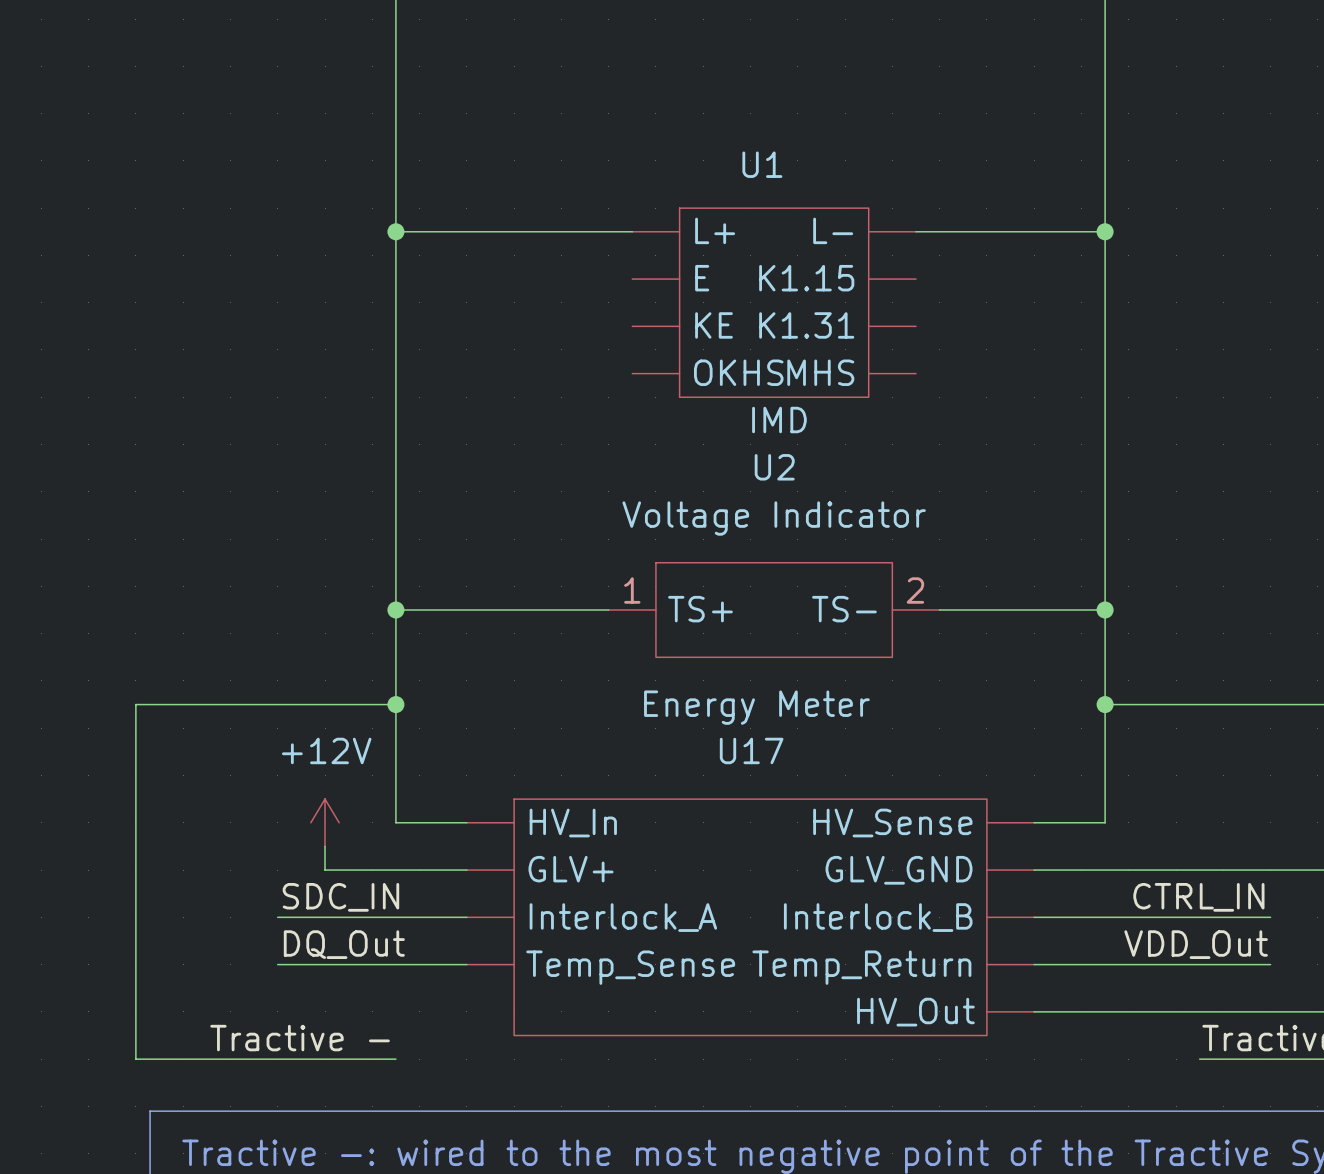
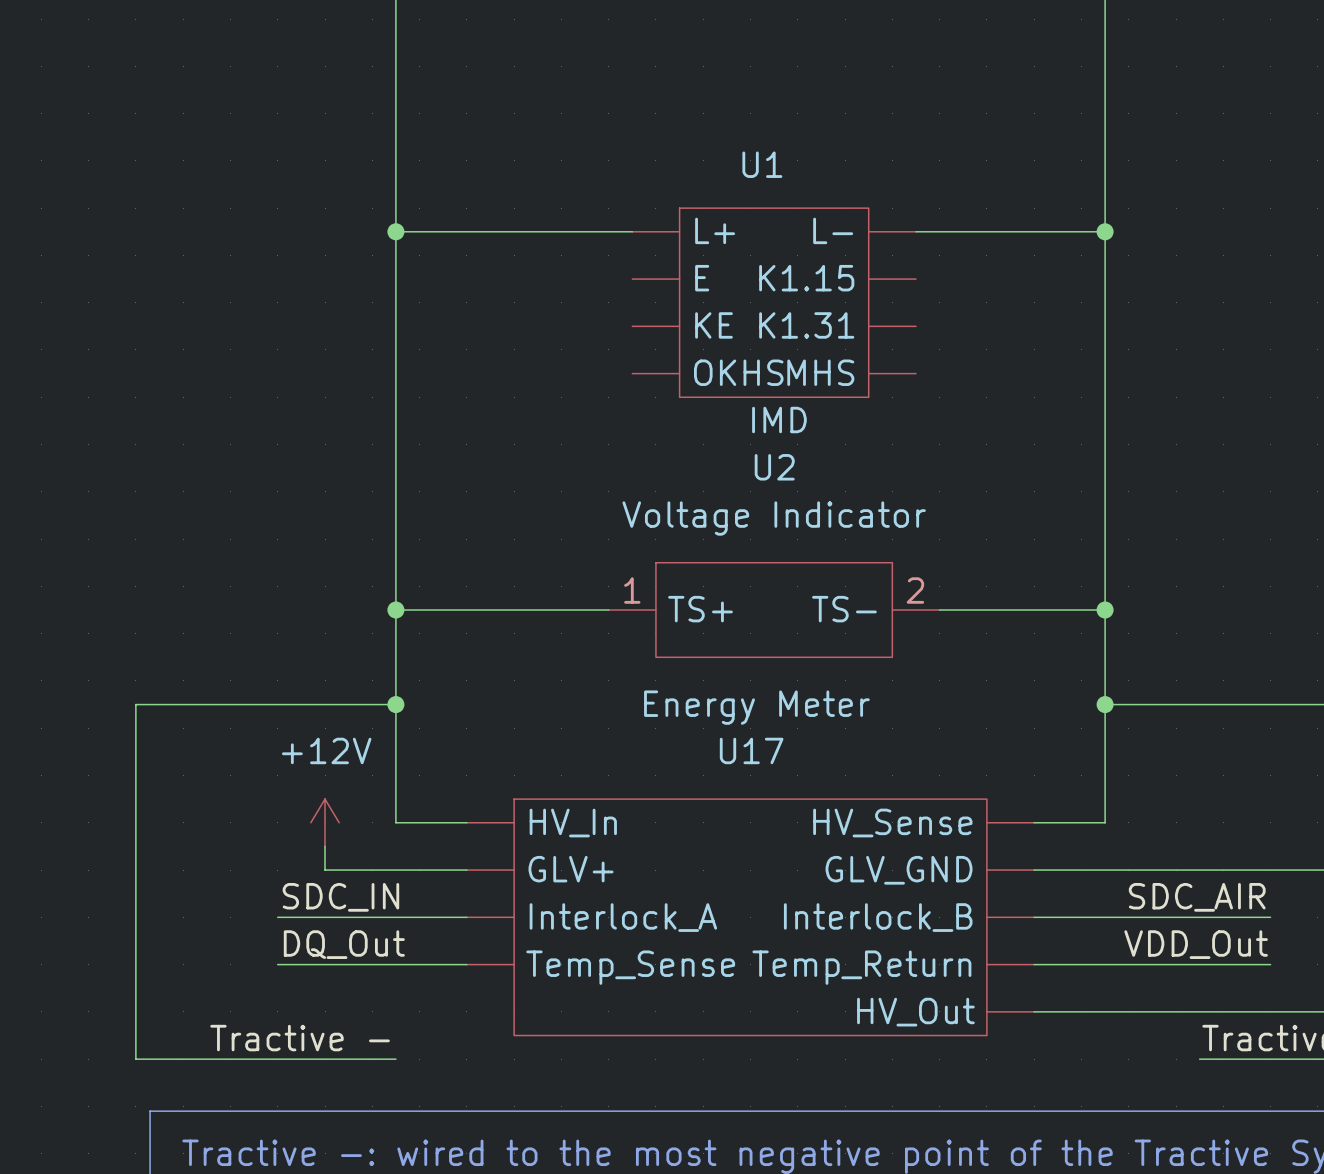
label: CTRL_IN (1198, 897) -> SDC_AIR (1197, 897)

